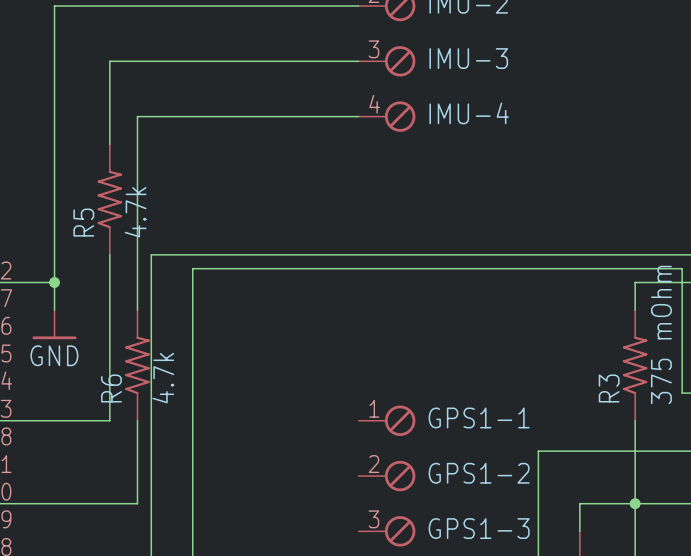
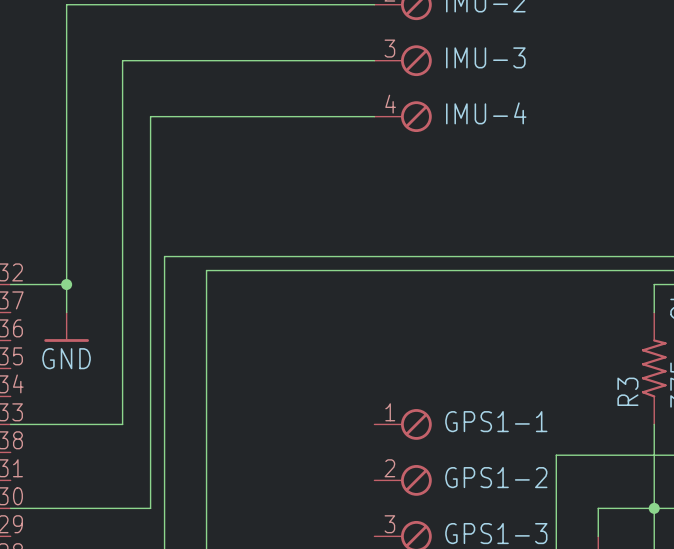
R5: 4.7k (109, 199) -> none
R6: 4.7k (137, 365) -> none

